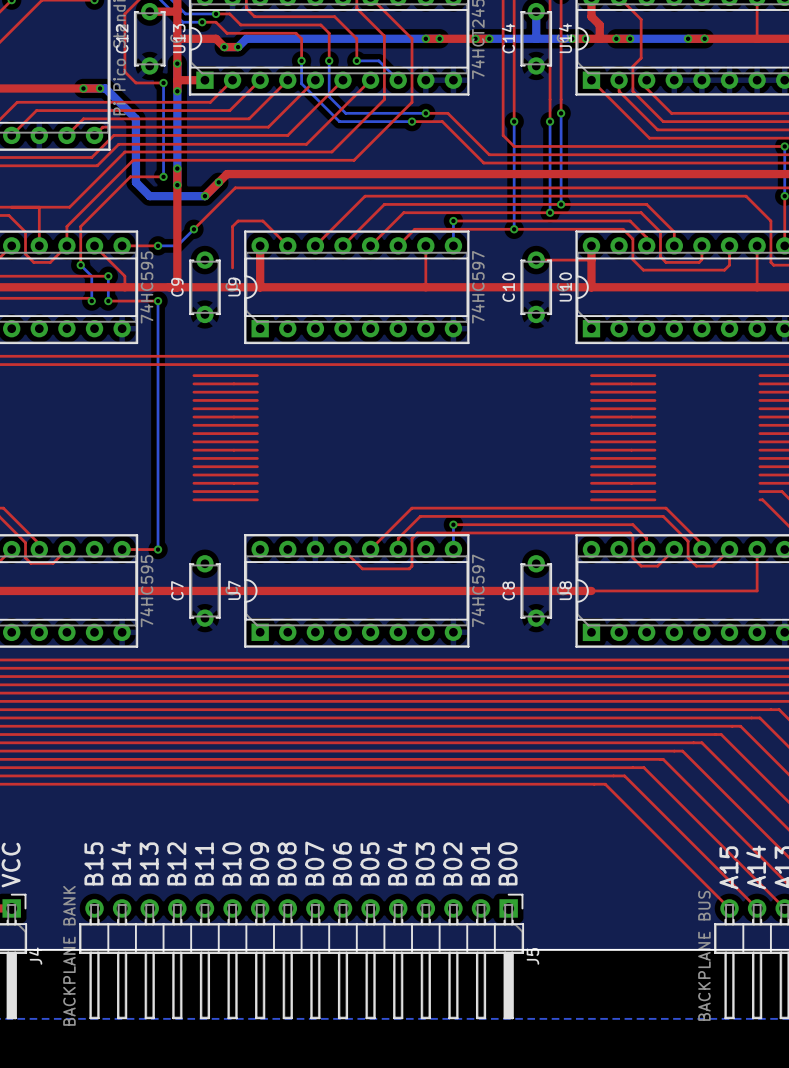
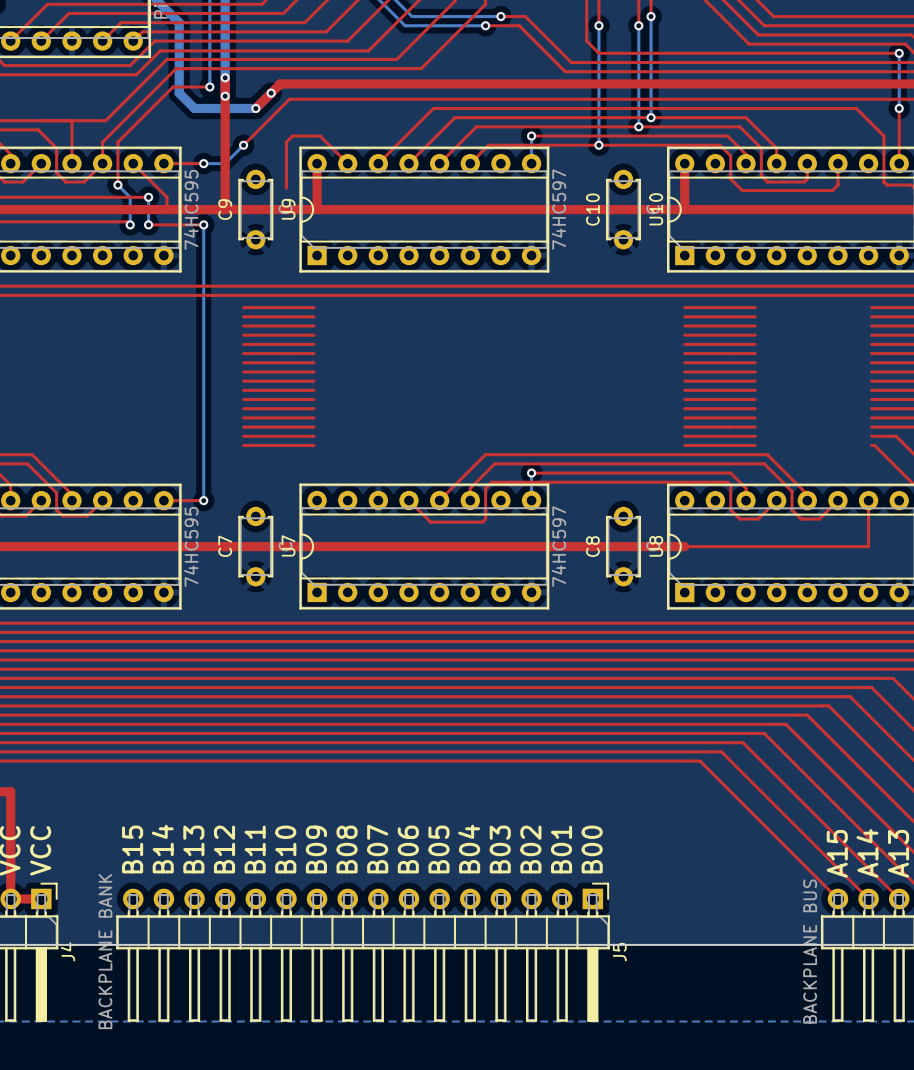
top track: (425, 245) (425, 287) -> none
top track: (757, 245) (757, 287) -> none
top track: (591, 259) (536, 260) -> none

